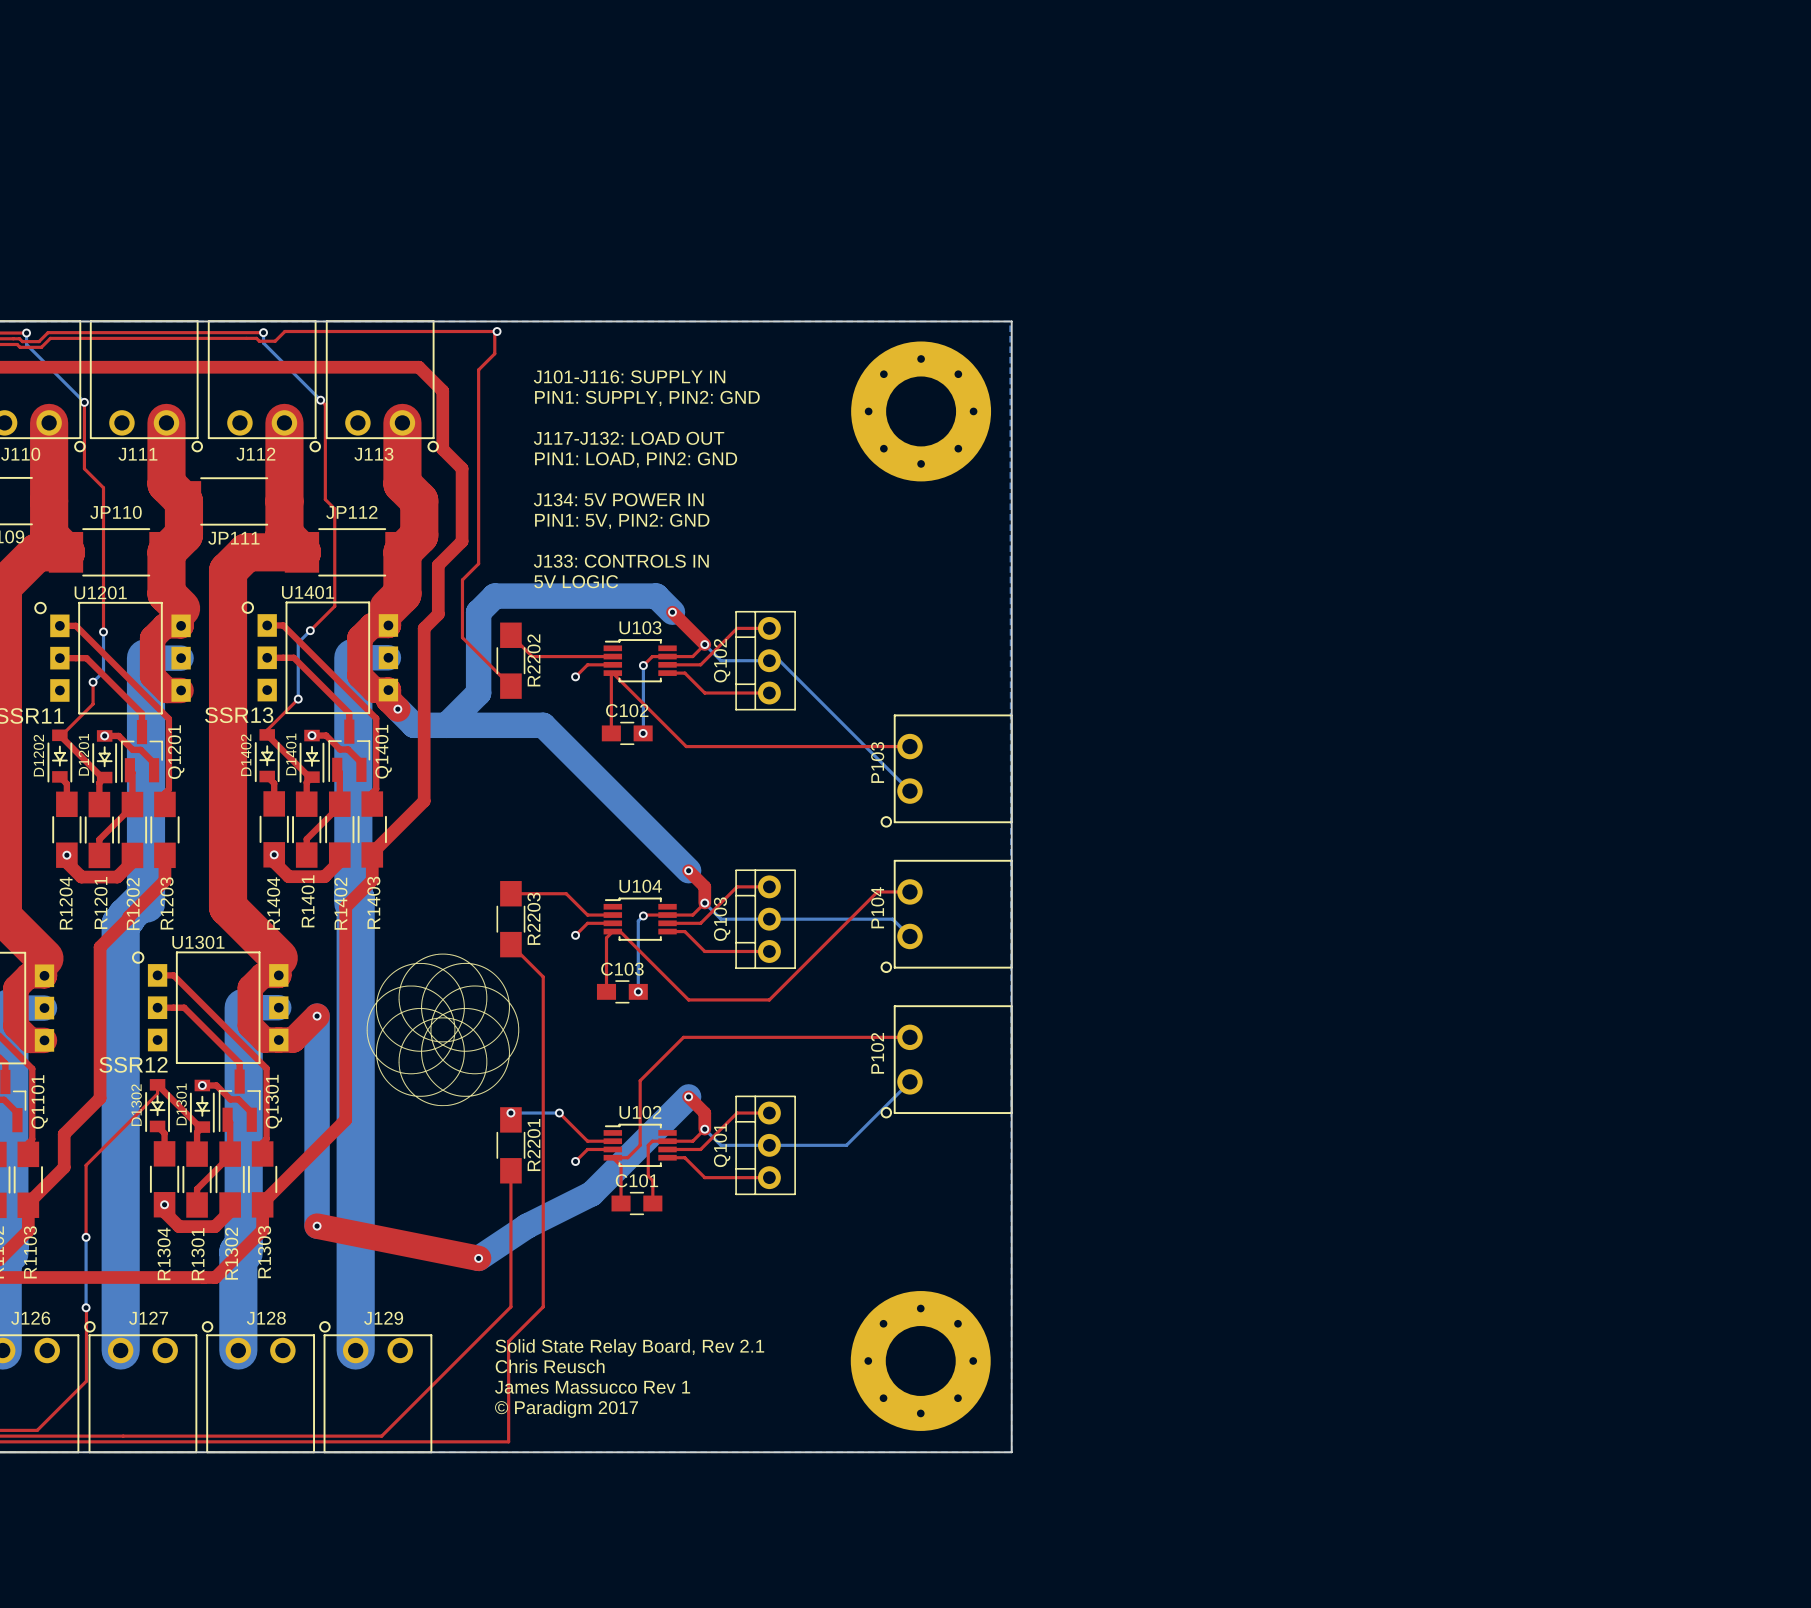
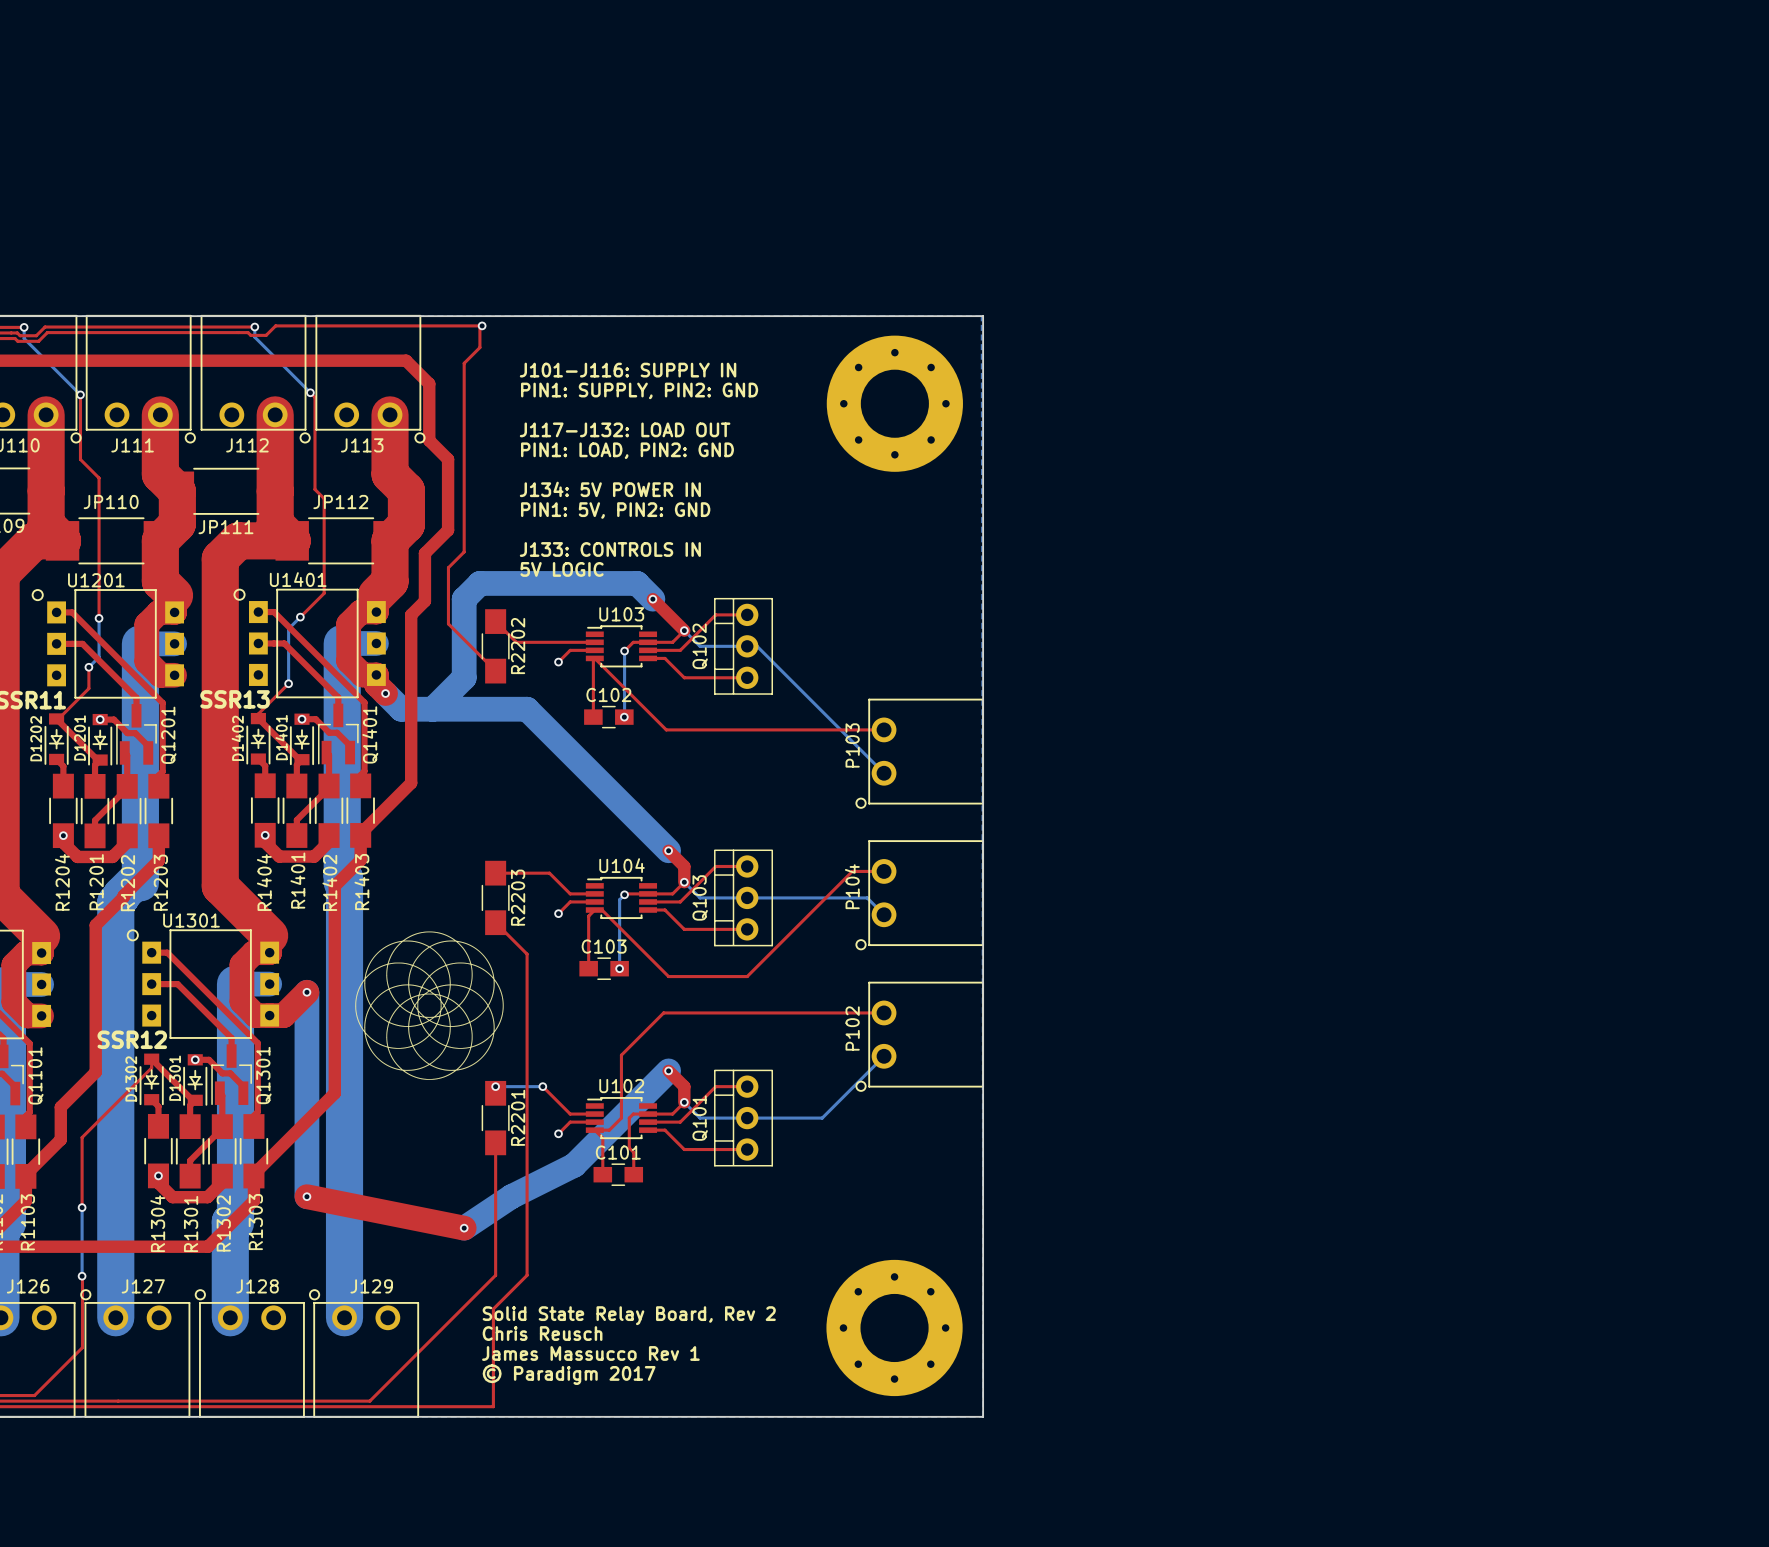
text: Solid State Relay Board, Rev 2.1 (629, 1347) -> Solid State Relay Board, Rev 2 (629, 1315)

